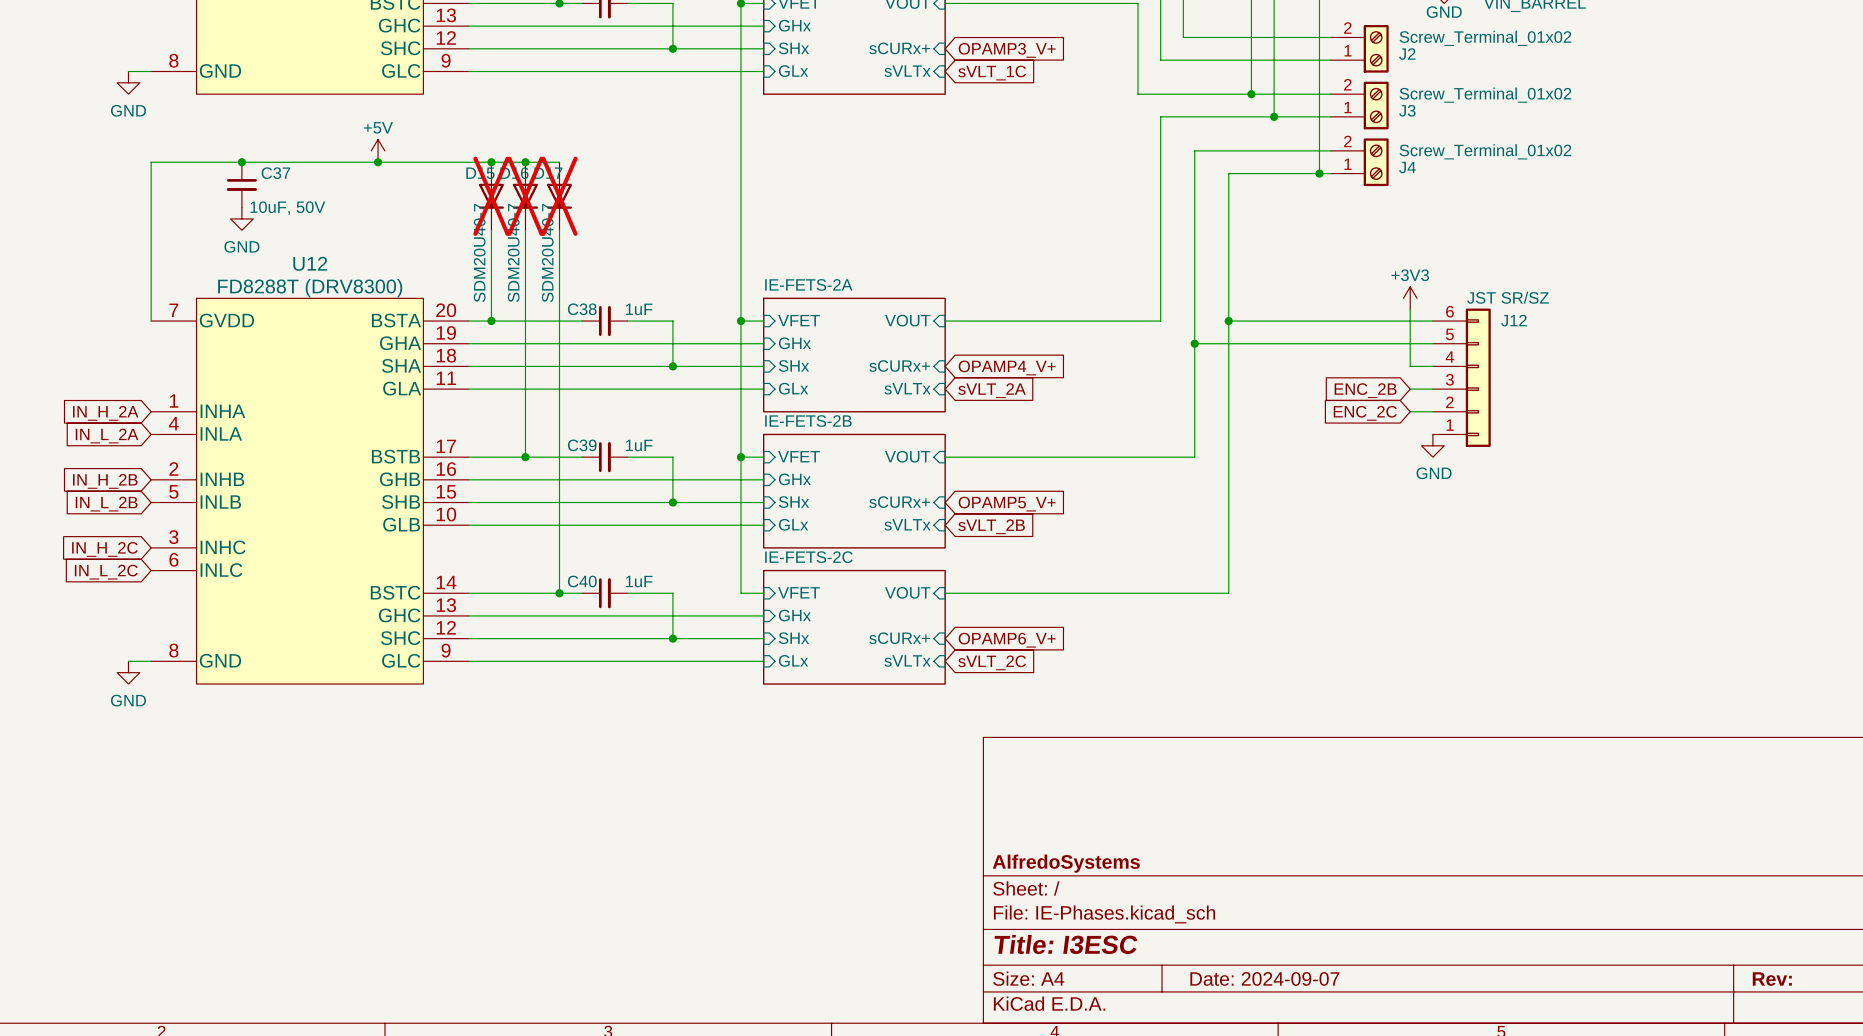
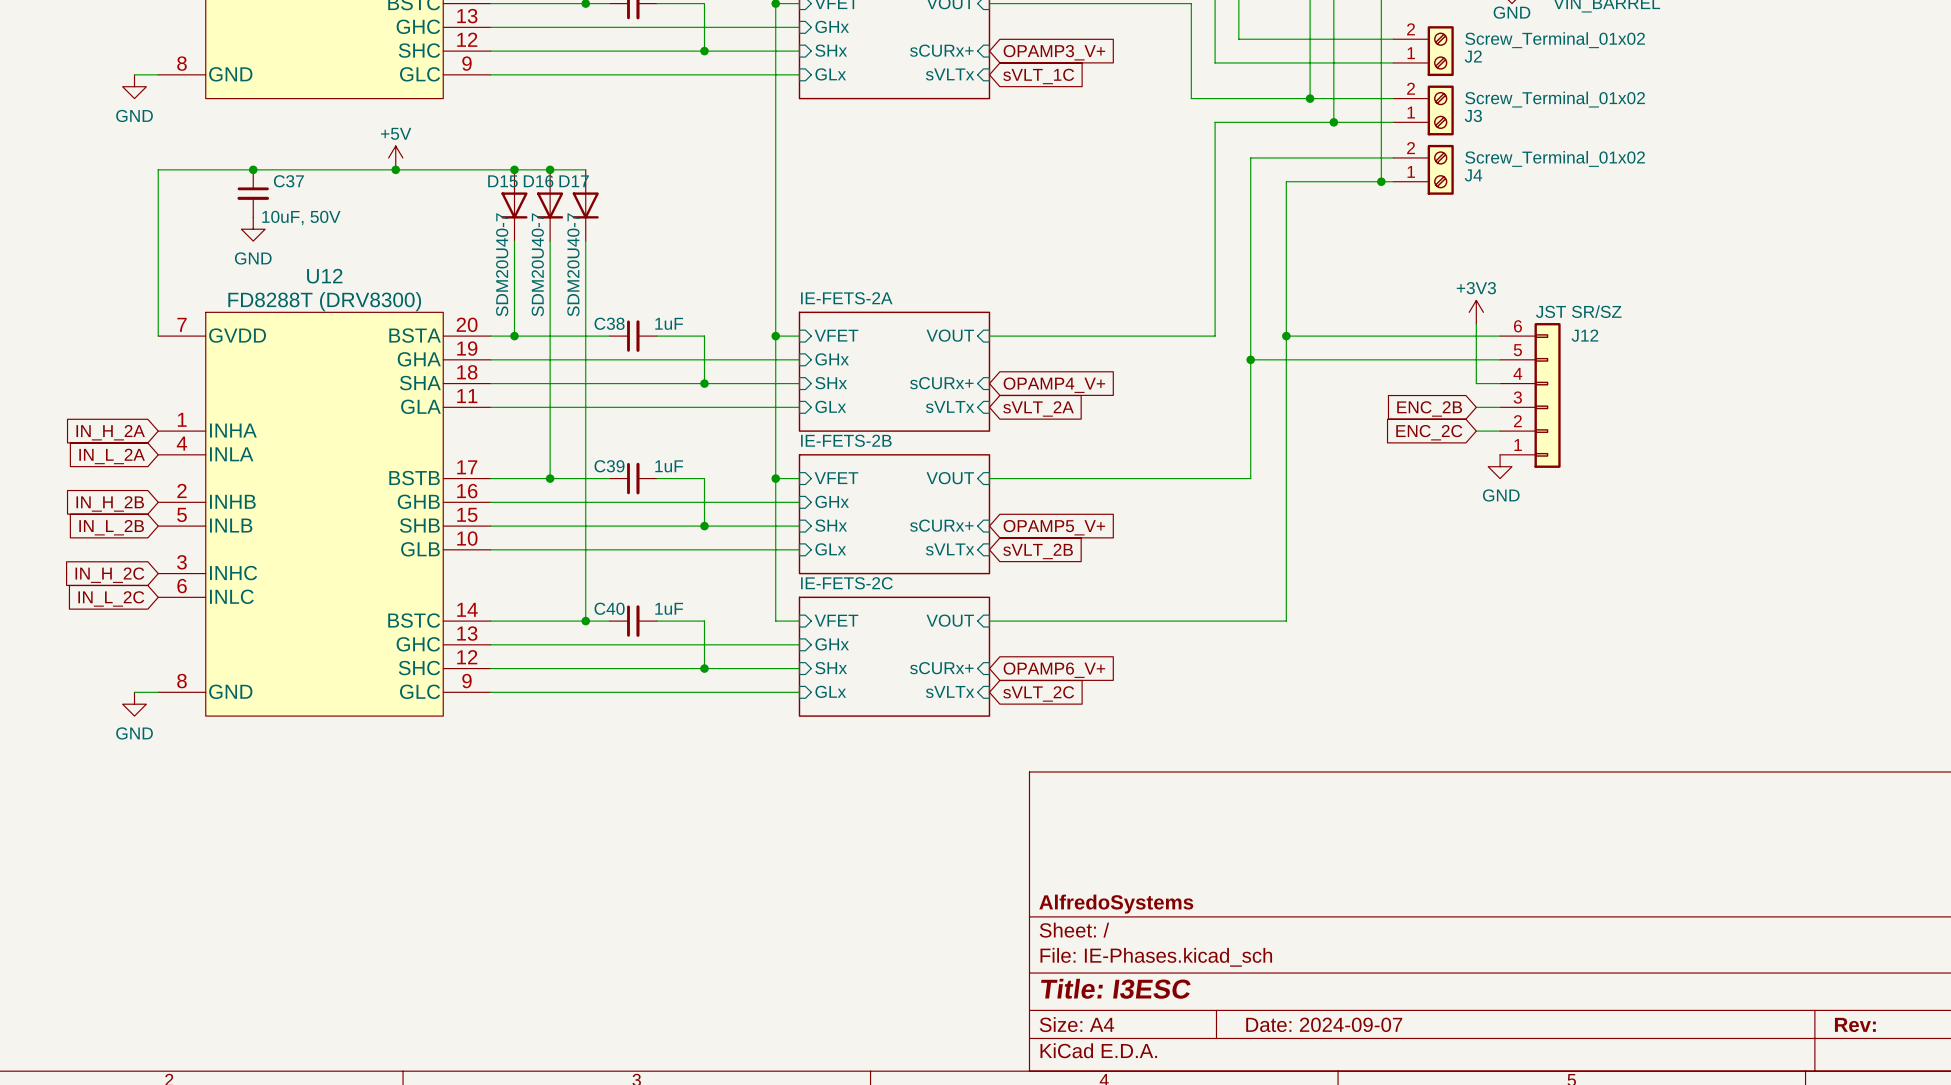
D15 do-not-place cross: (491, 196) -> none
D16 do-not-place cross: (525, 196) -> none
D17 do-not-place cross: (559, 196) -> none

